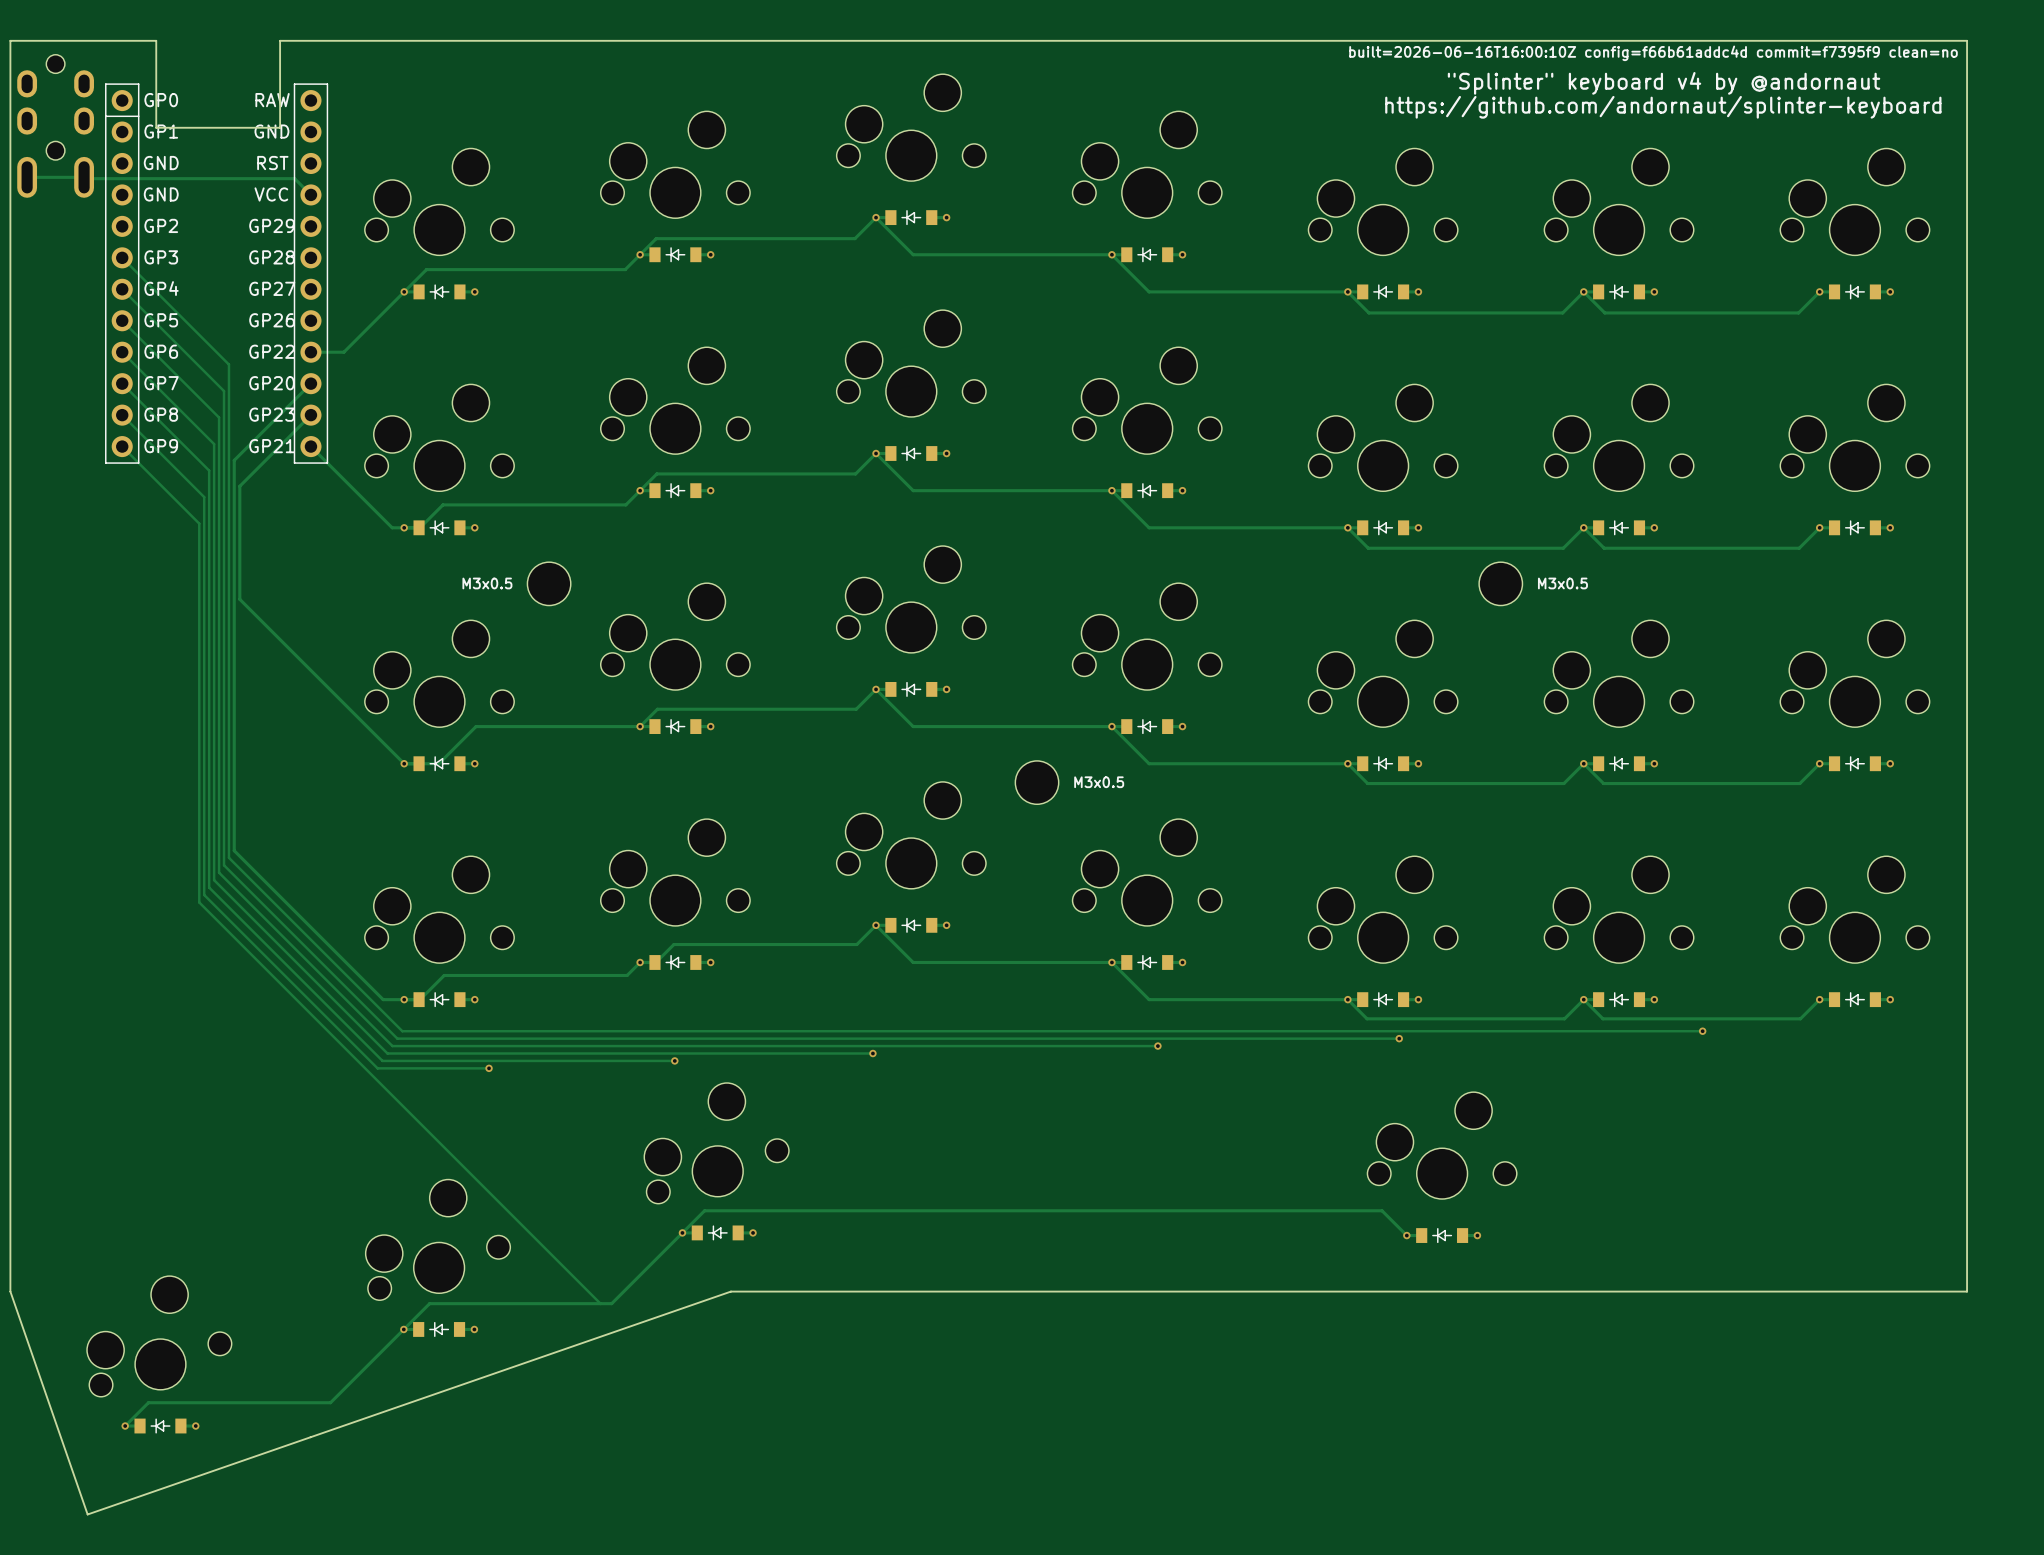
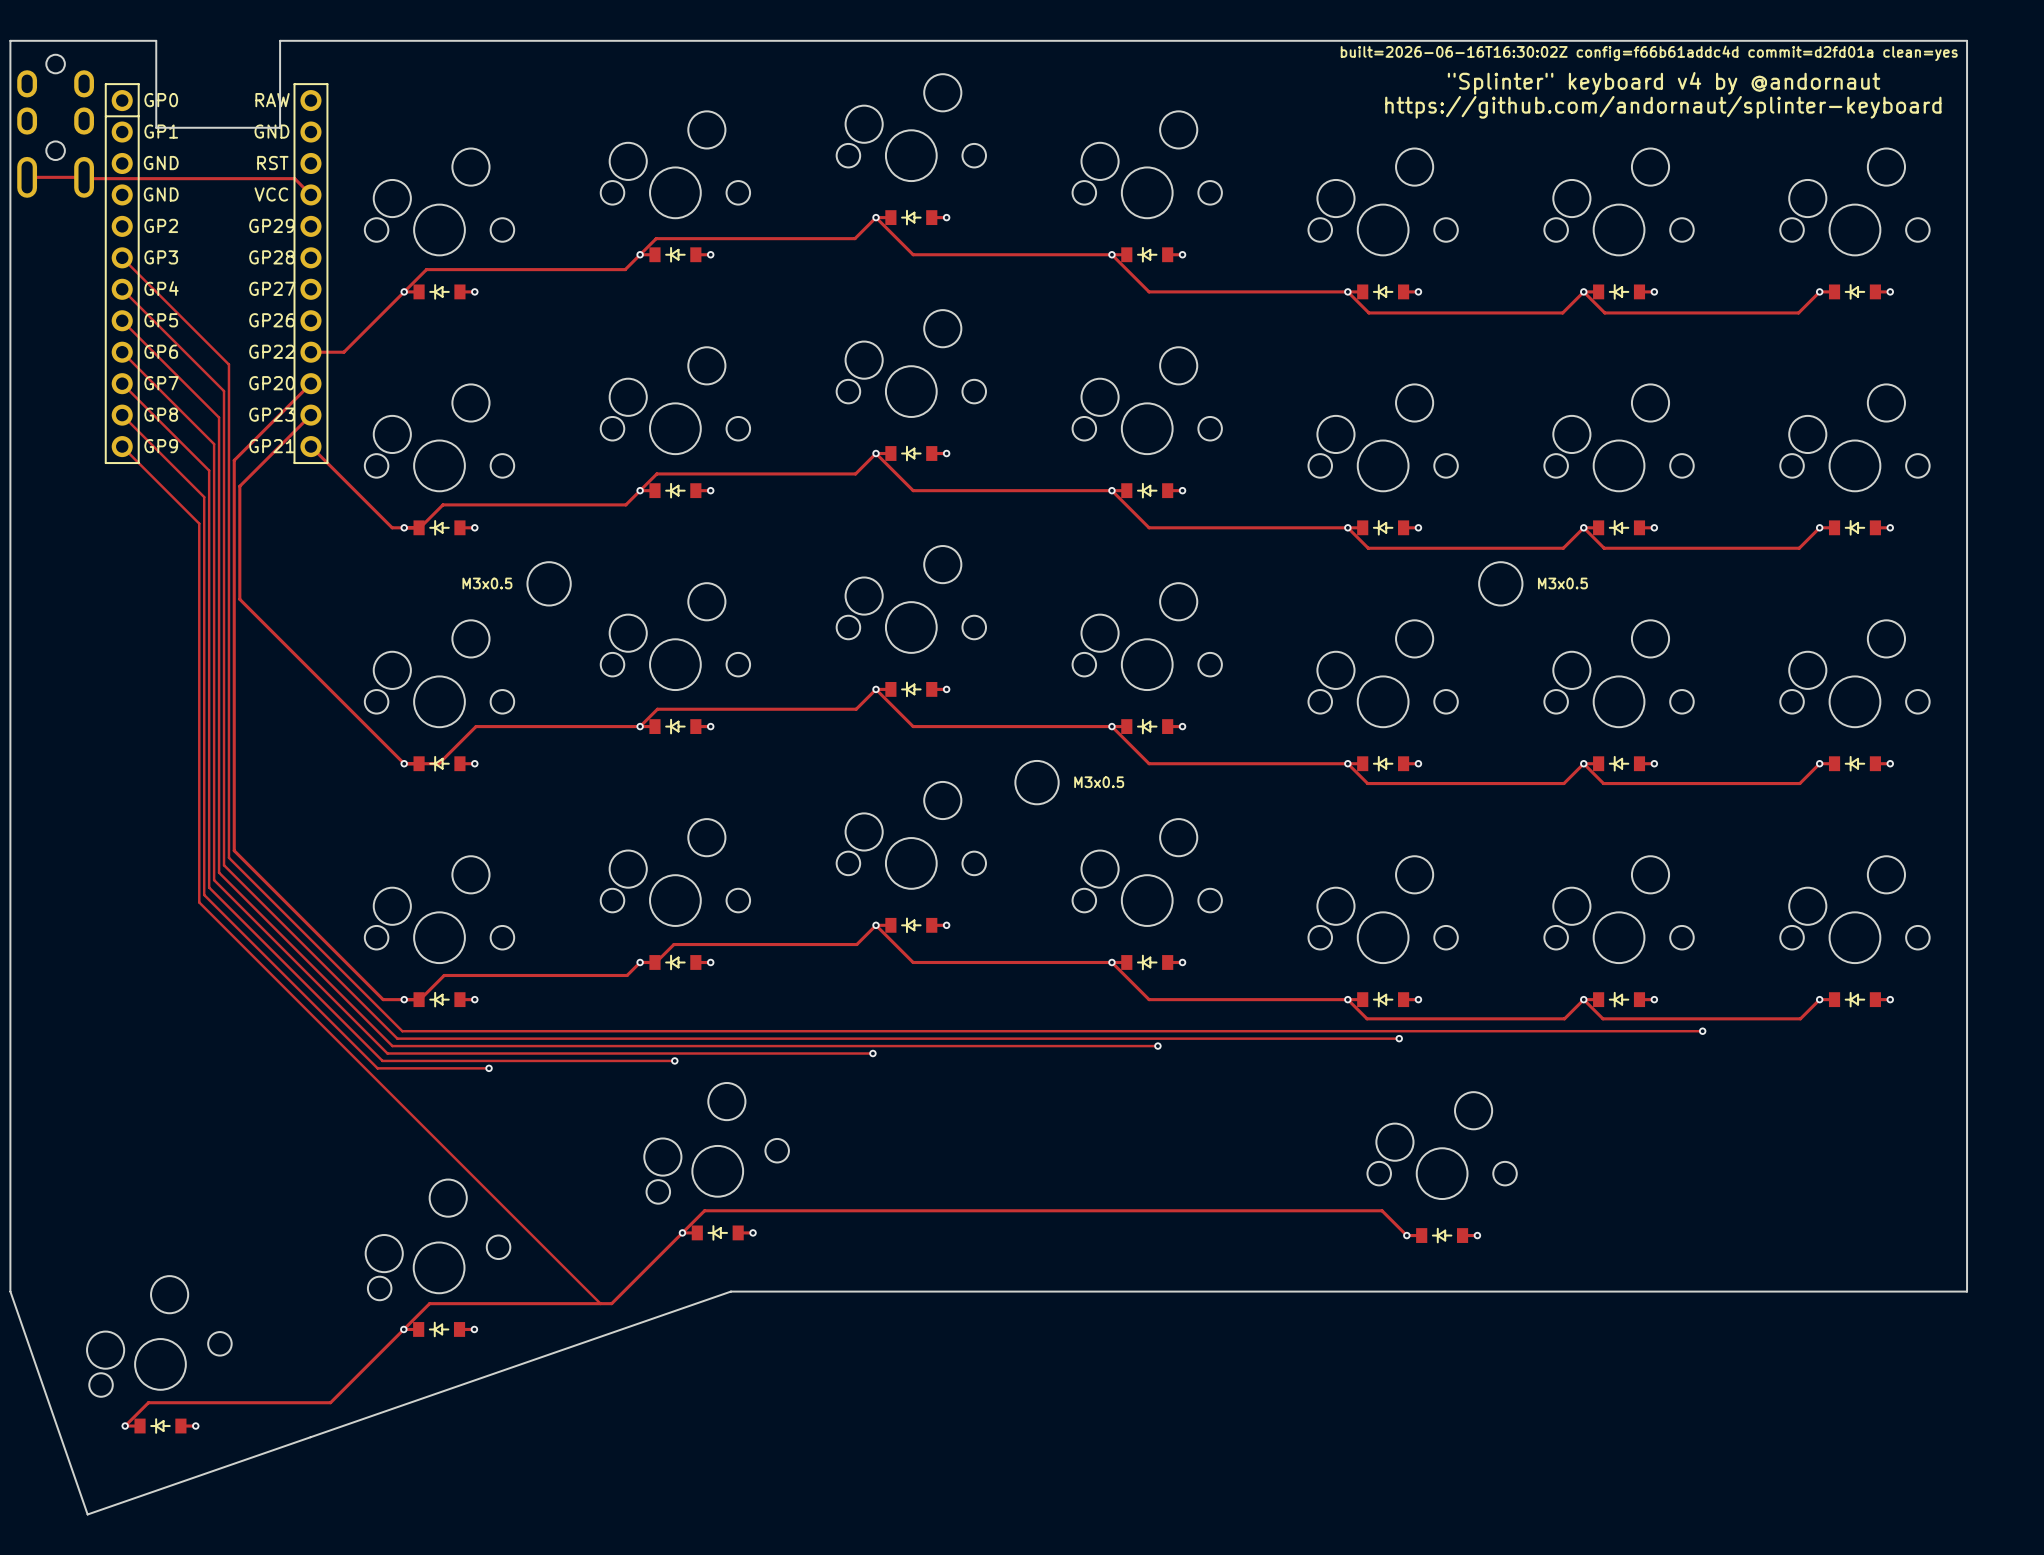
text: built=2026-06-16T16:00:10Z config=f66b61addc4d commit=f7395f9 clean=no (1653, 53) -> built=2026-06-16T16:30:02Z config=f66b61addc4d commit=d2fd01a clean=yes (1649, 53)

